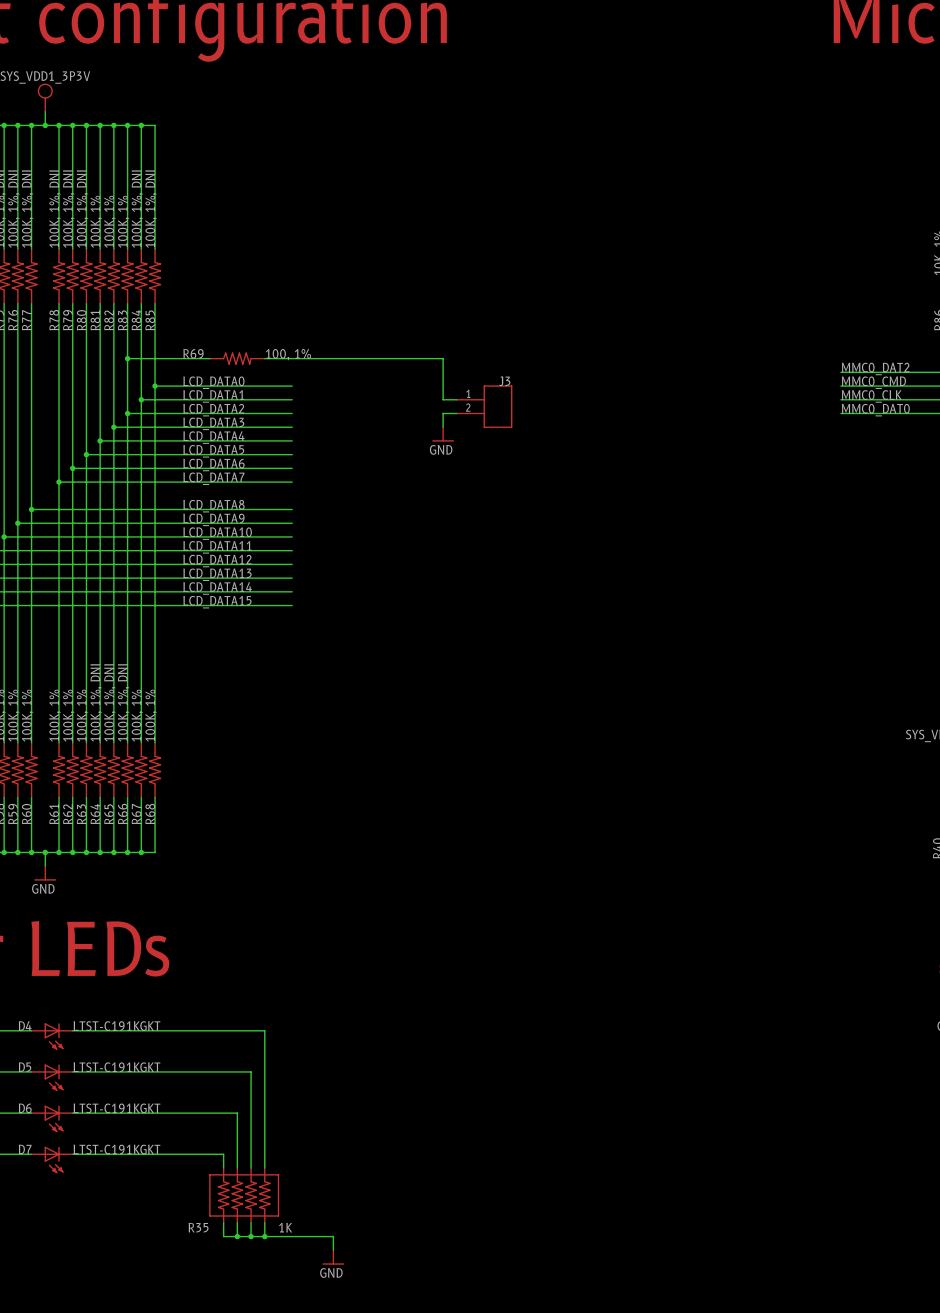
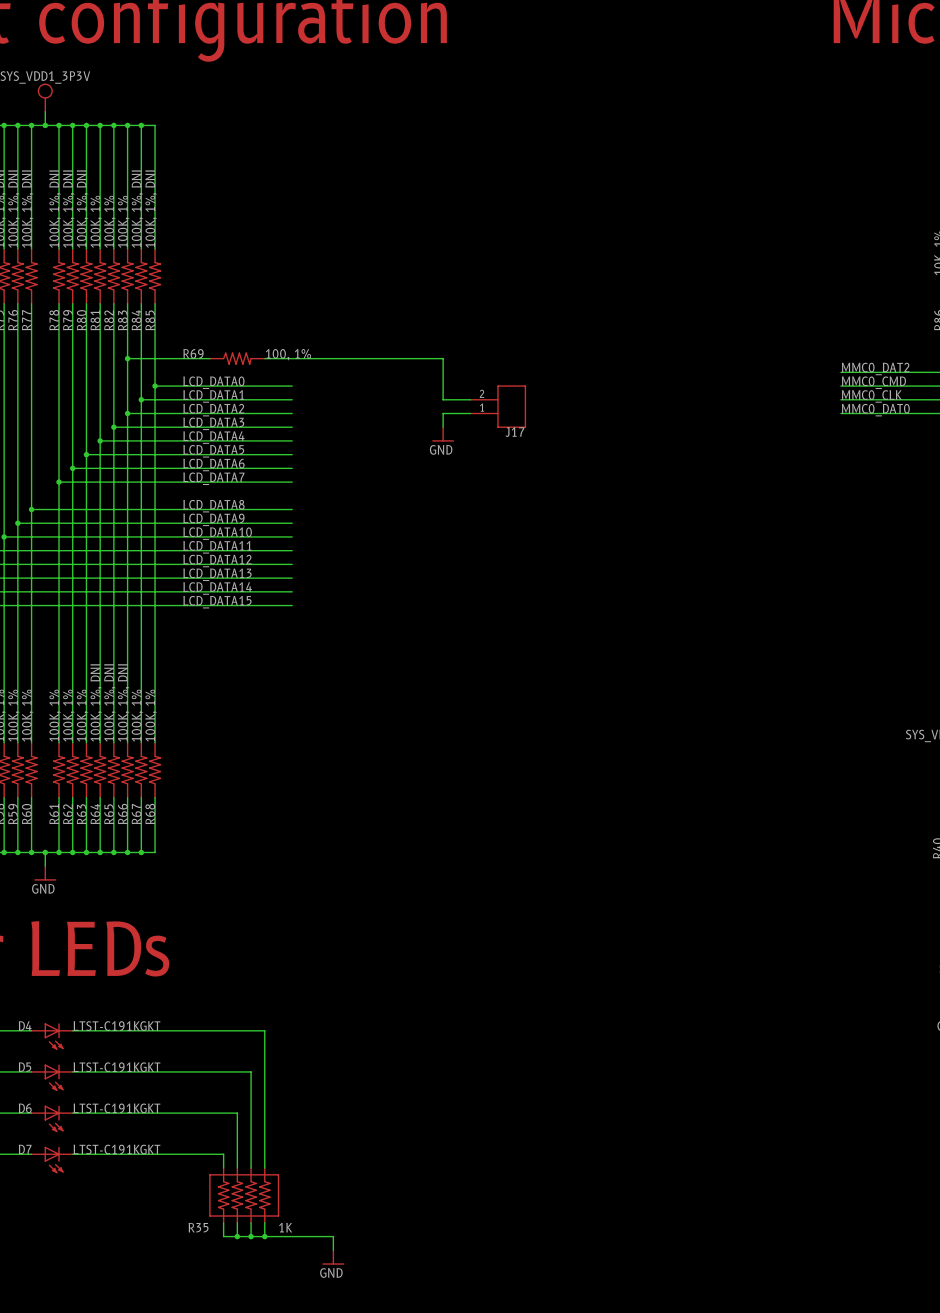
J3: (484, 406) -> none
J17: none -> (498, 406)

